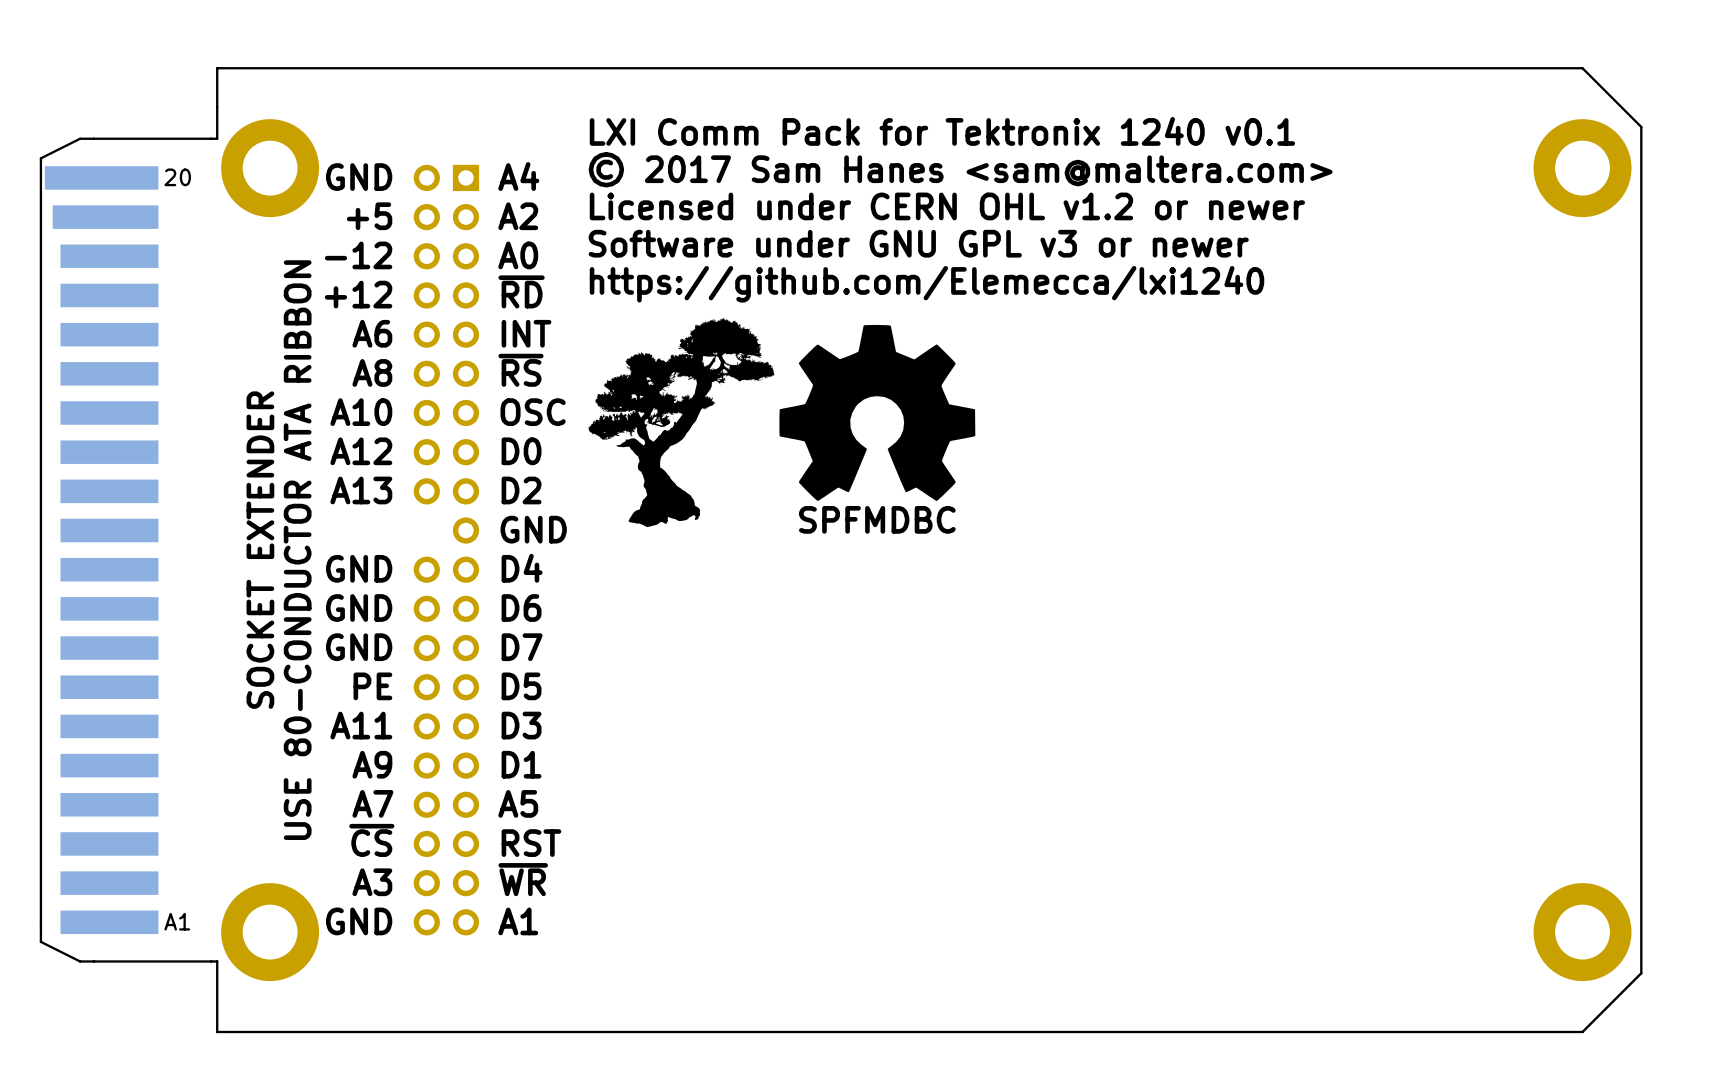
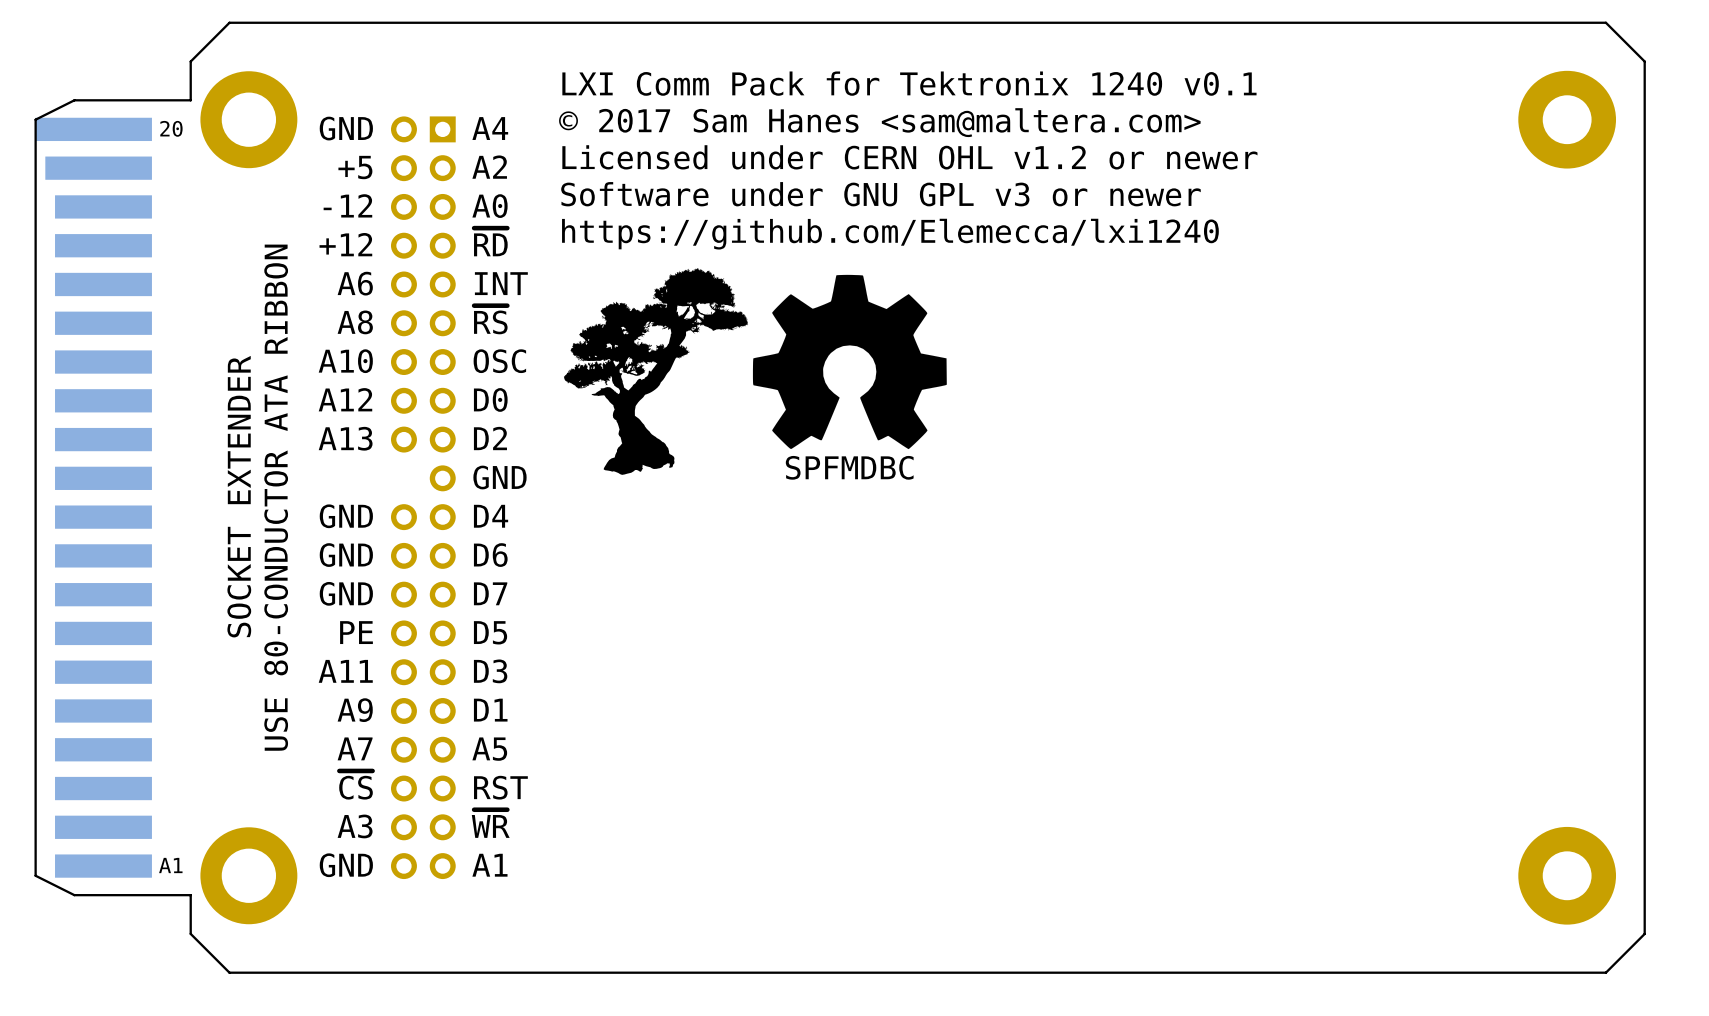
board edge: (1582, 68) (217, 68) (217, 138) (80, 138) (40, 158) (40, 941) (80, 961) (217, 961) (217, 1031) (1582, 1031) (1641, 973) (1641, 126) (1582, 68) -> (1605, 22) (1644, 61) (1644, 933) (1605, 972) (229, 972) (190, 933) (190, 895) (74, 895) (35, 875) (35, 119) (74, 100) (190, 100) (190, 61) (229, 22) (1605, 22)
part footprint: [44, 166, 159, 935] -> [35, 117, 152, 878]
part: (1582, 168) -> none
part: none -> (1567, 119)
part: (1582, 932) -> none
part: none -> (1567, 875)

